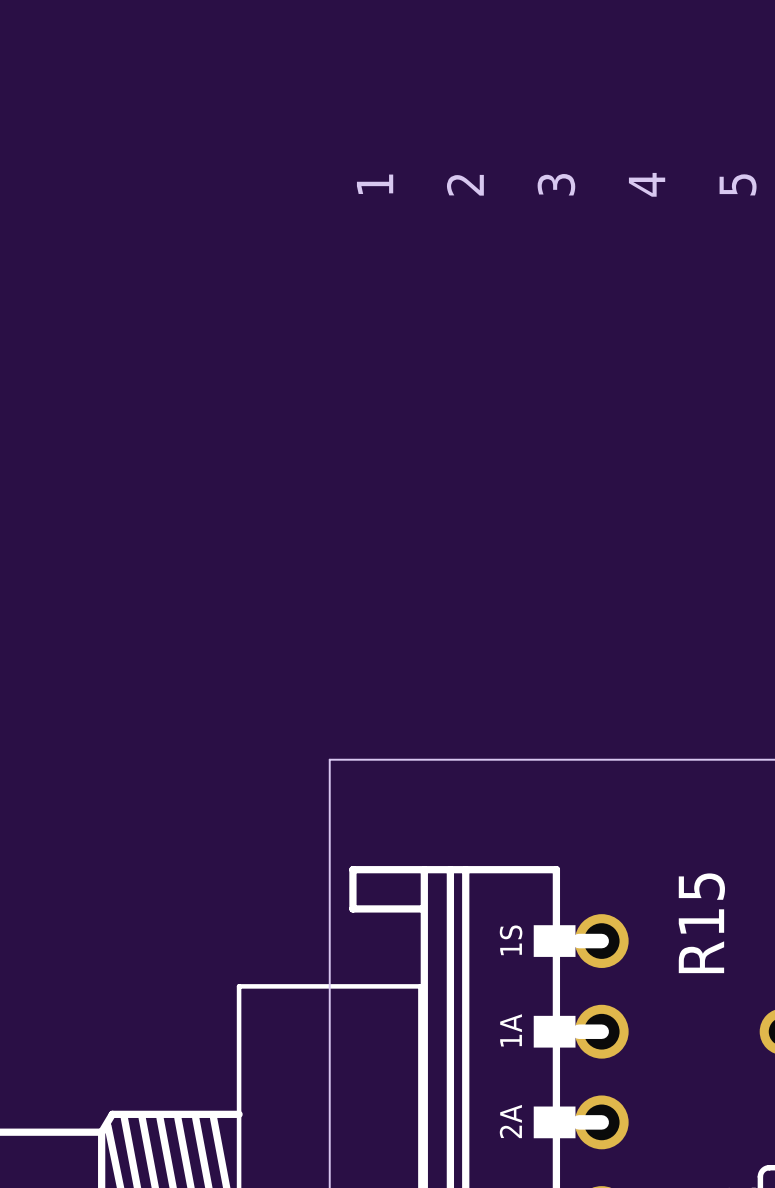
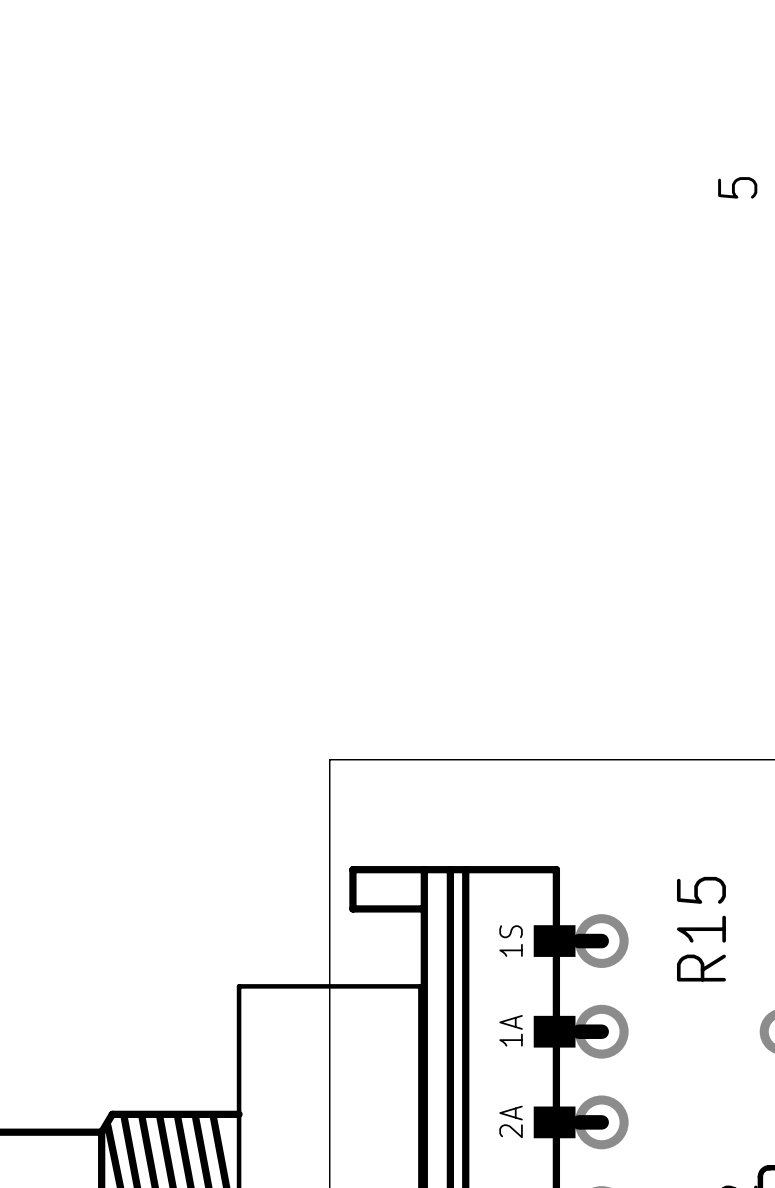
text: 1 (375, 184) -> none
text: 3 (556, 184) -> none
text: 4 (647, 184) -> none
text: 2 (465, 185) -> none

